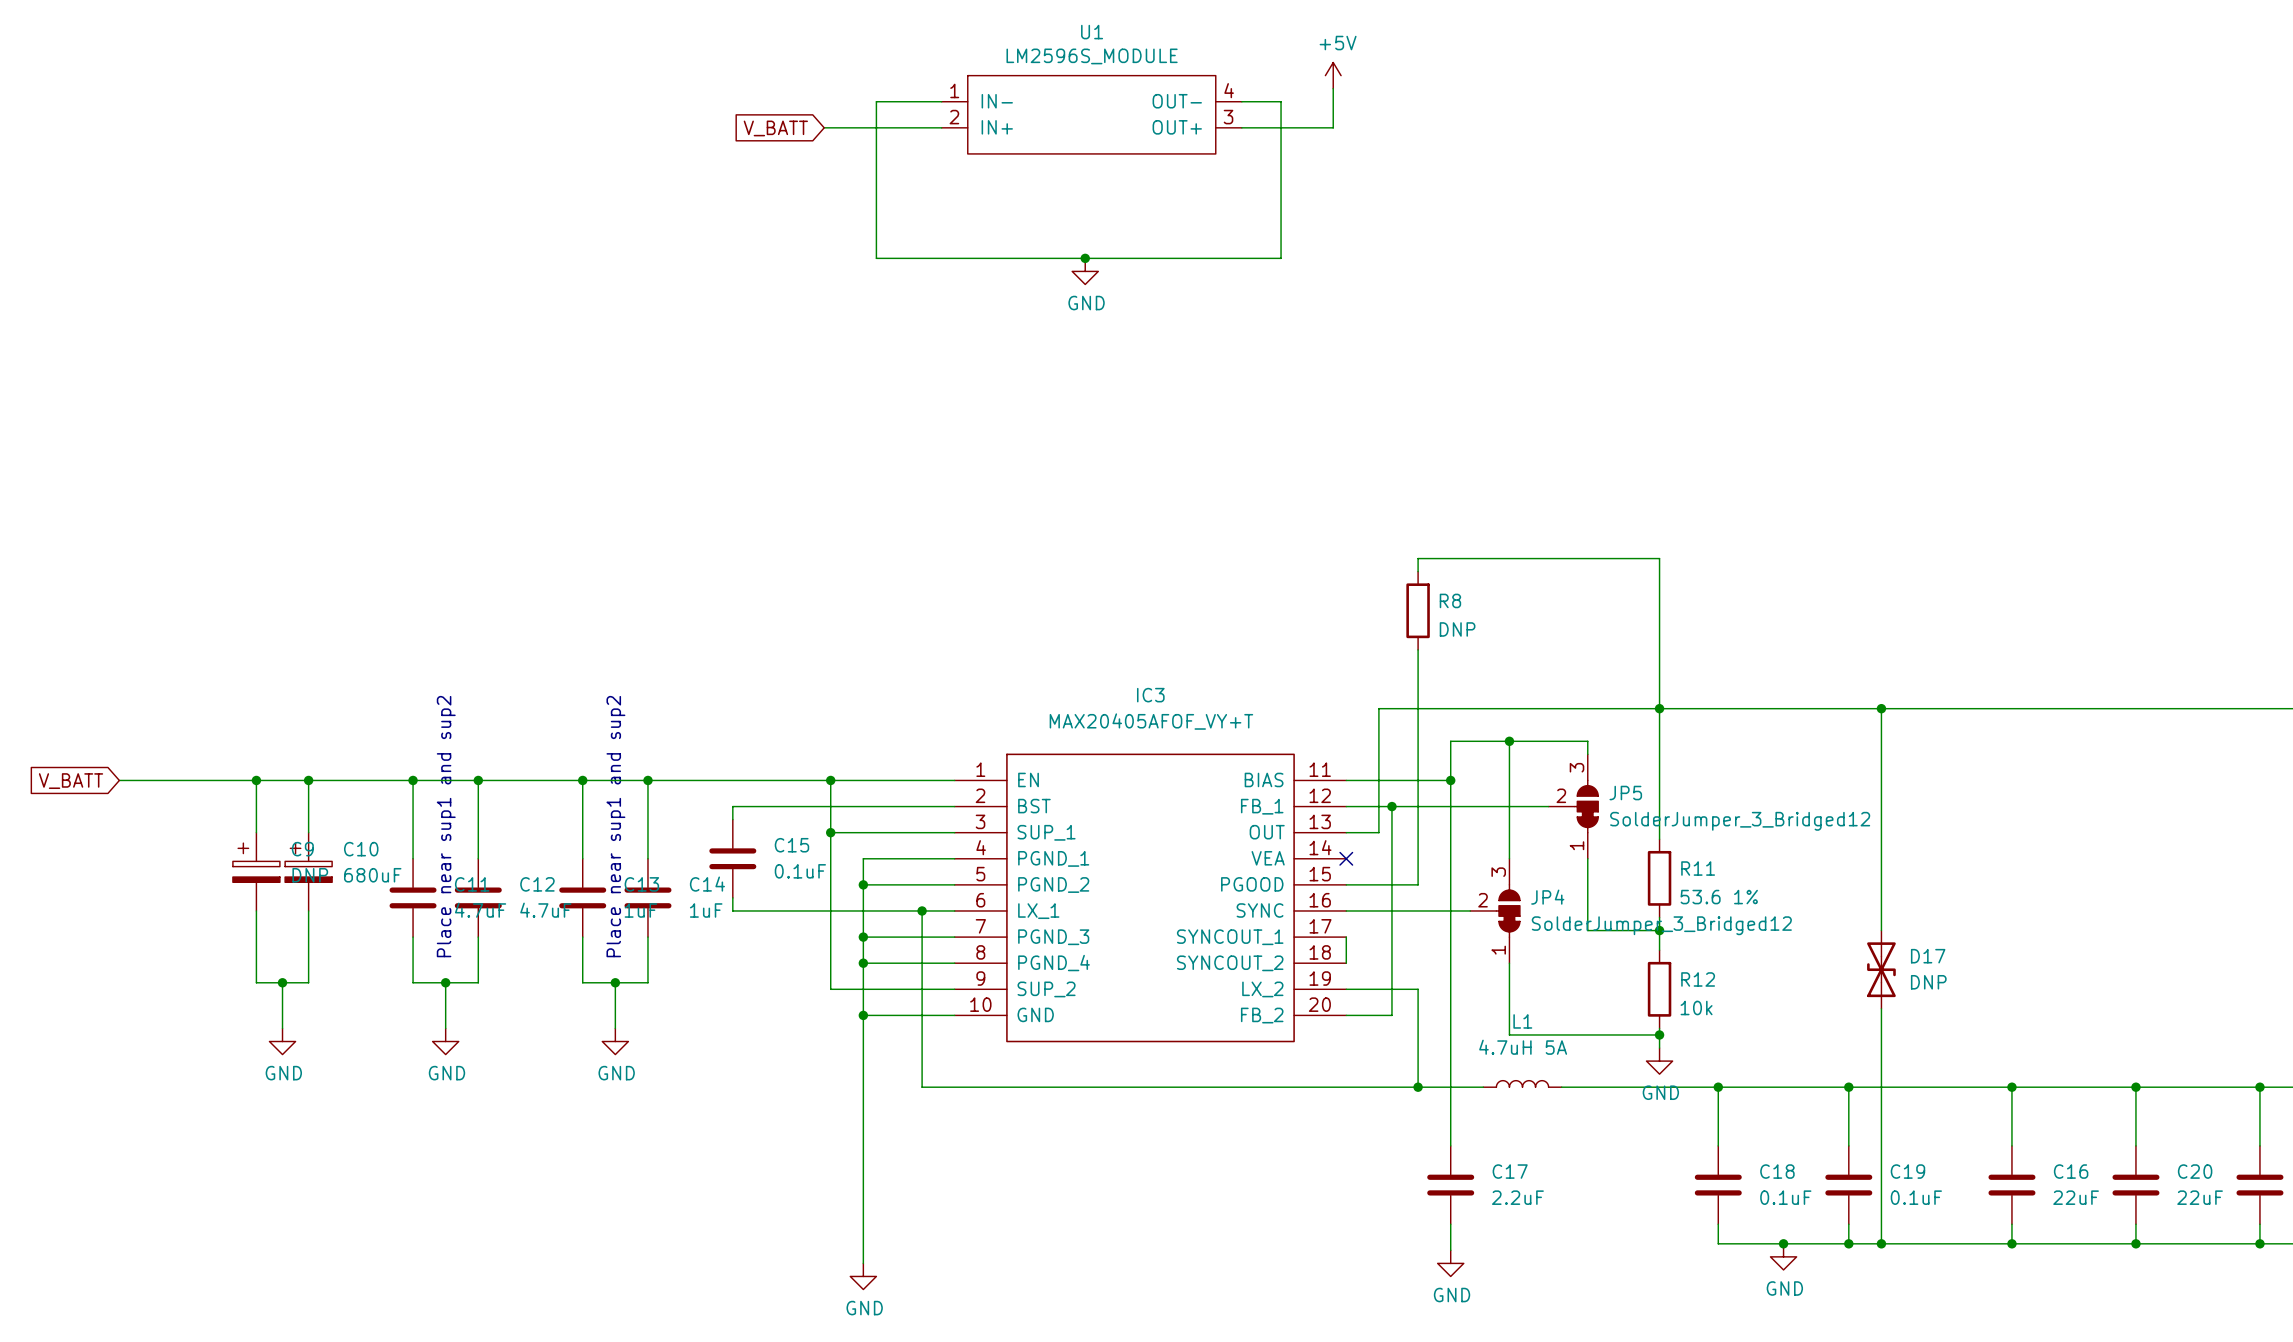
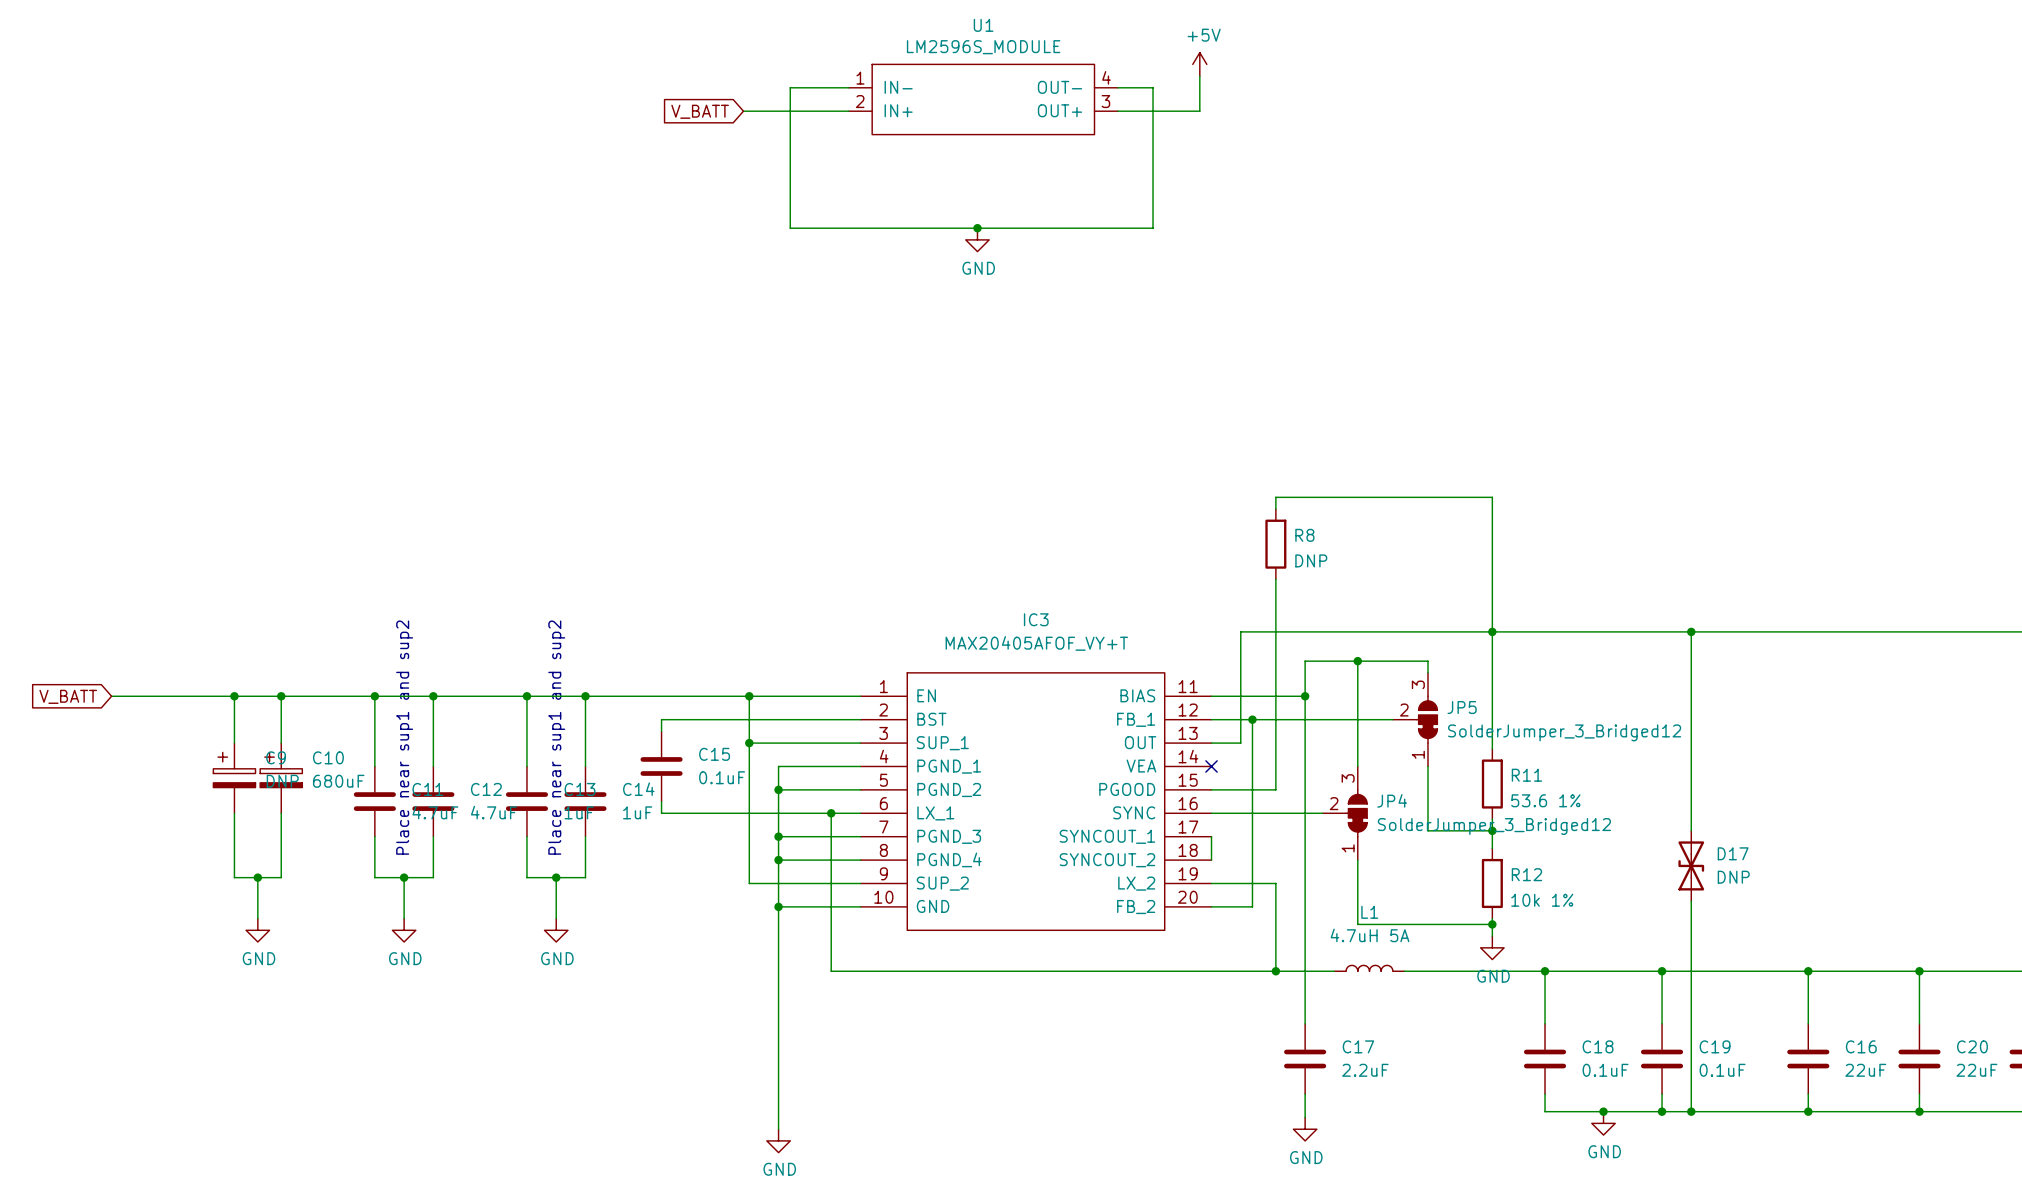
R12 value: 10k (1696, 1008) -> 10k 1% (1542, 900)

